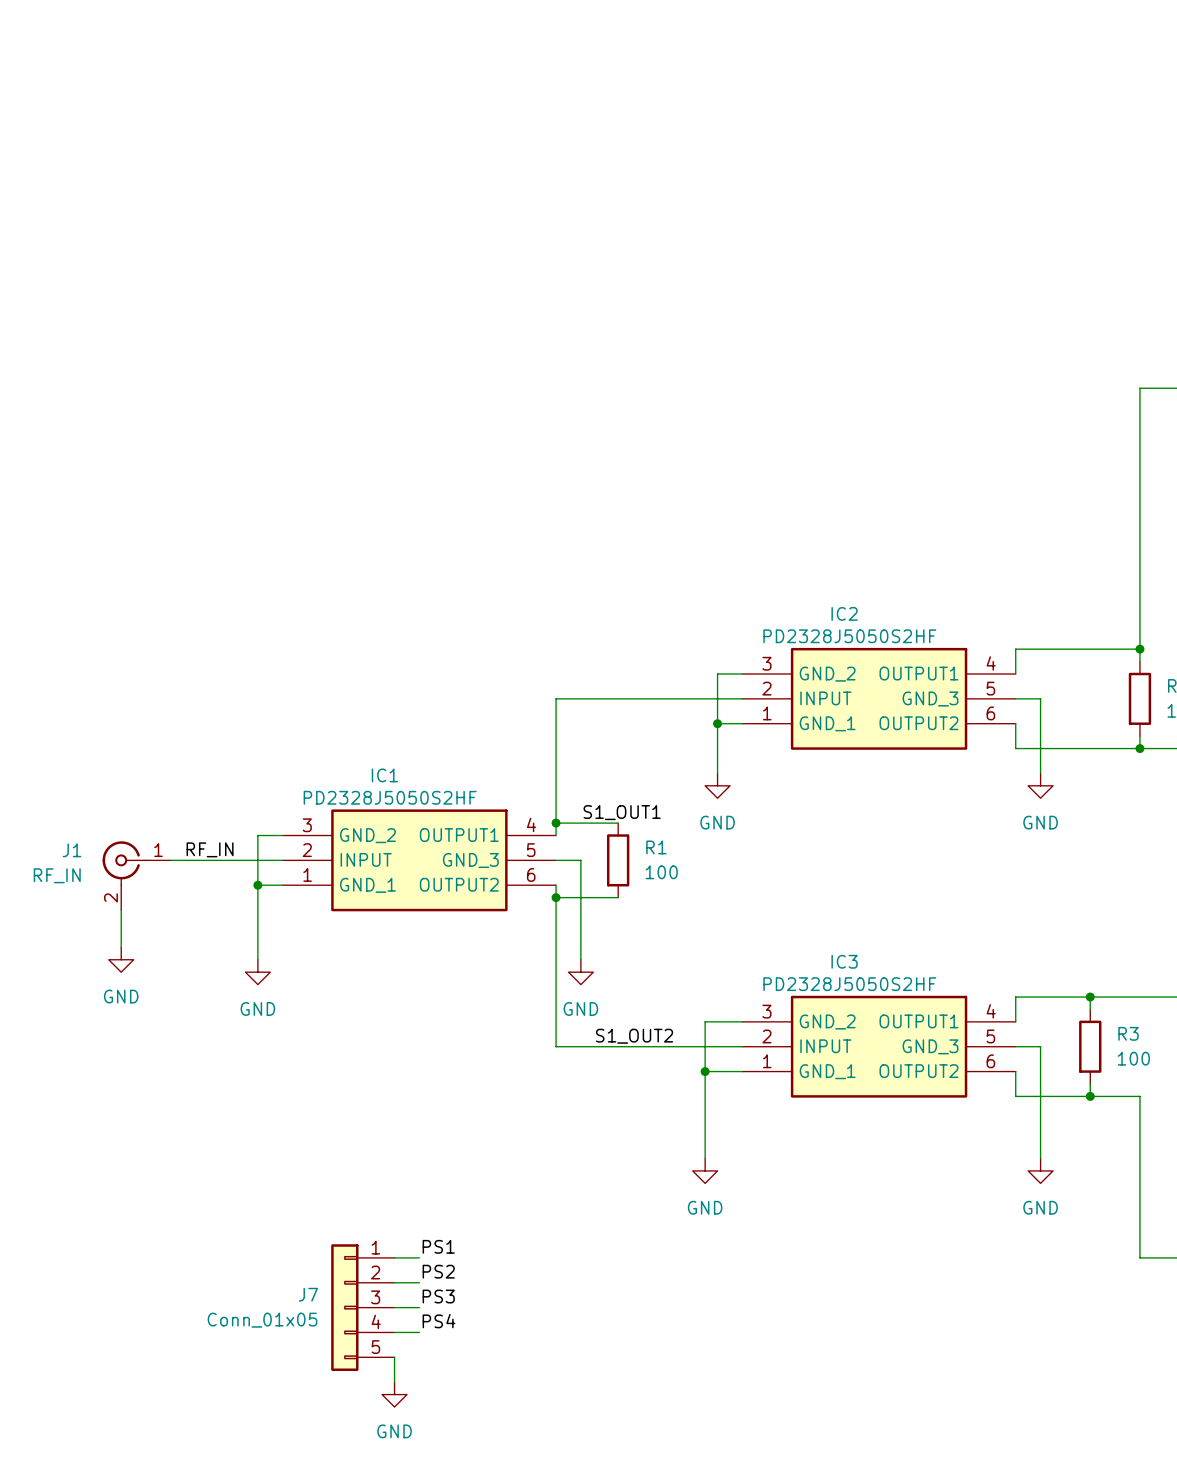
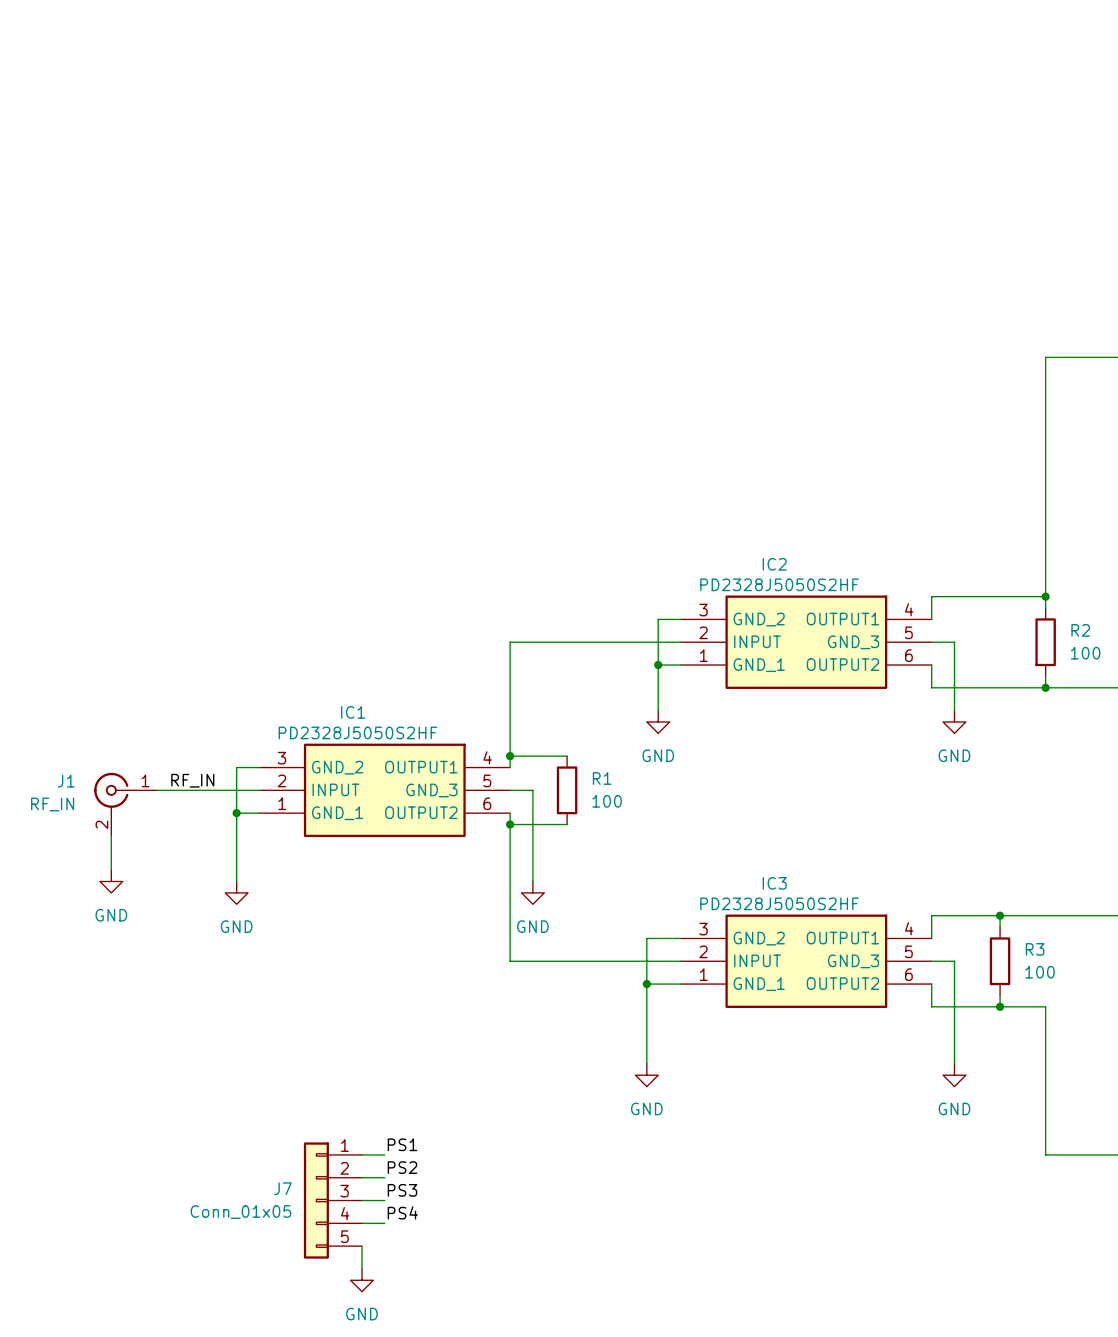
label: S1_OUT1 (622, 812) -> none
label: S1_OUT2 (634, 1036) -> none

